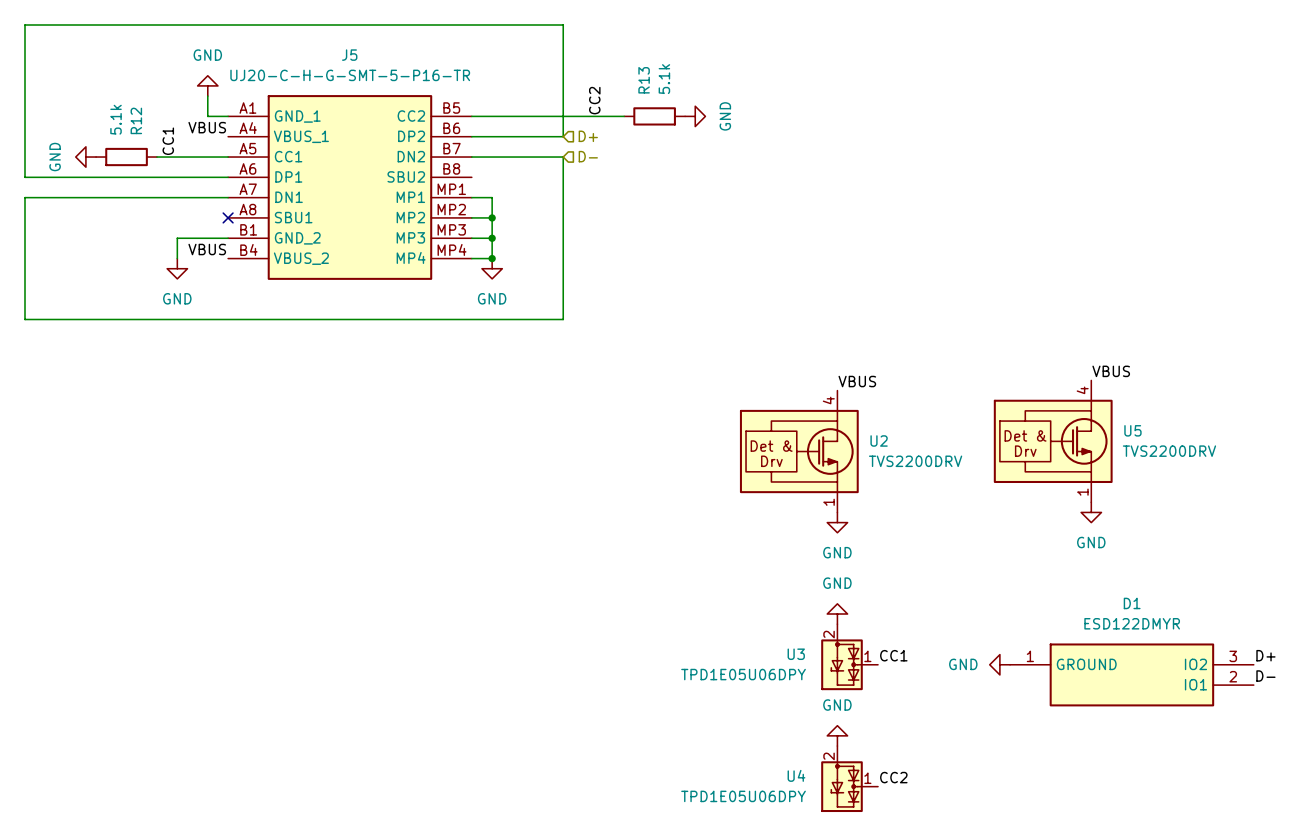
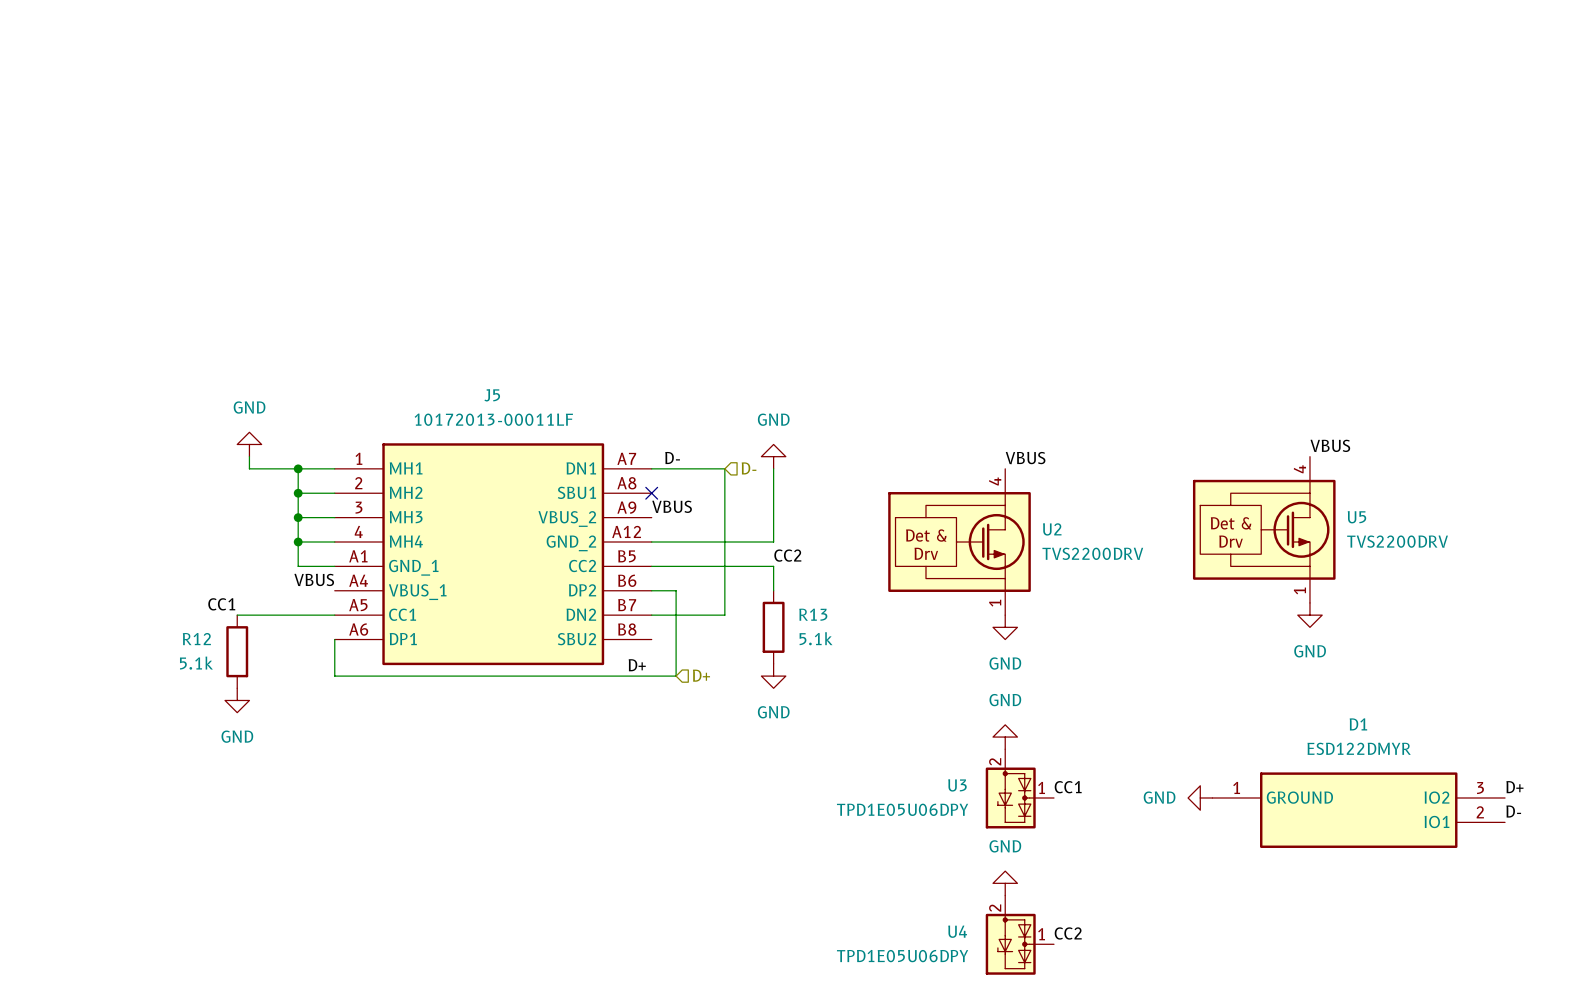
J5 value: UJ20-C-H-G-SMT-5-P16-TR (350, 75) -> 10172013-00011LF (493, 419)
power symbol: GND (207, 85) -> none
J5 symbol: [228, 95, 472, 280] -> [334, 443, 652, 666]
wire: (207, 96) (207, 116) (228, 116) -> none
label: CC2 (594, 100) -> none
wire: (471, 116) (624, 116) -> none
R13 rotation: 0° (654, 116) -> 90° clockwise (773, 627)
R13 position: (654, 116) -> (773, 627)
power symbol: GND (695, 116) -> none
R12 value position: 5.1k (116, 119) -> 5.1k (196, 663)
R12 name position: R12 (136, 120) -> R12 (196, 639)
label: VBUS (207, 127) -> none
wire: (471, 136) (563, 136) (563, 25) (25, 25) (25, 177) (228, 177) -> none
hierarchical label: D+ (588, 136) -> none
label: CC1 (168, 141) -> none
hierarchical label: D- (588, 156) -> none
power symbol: GND (85, 157) -> none
R12 rotation: 0° (126, 157) -> 90° clockwise (237, 651)
R12 position: (126, 157) -> (237, 651)
wire: (157, 157) (228, 157) -> none
wire: (471, 157) (563, 157) (563, 319) (25, 319) (25, 197) (228, 197) -> none
wire: (471, 197) (492, 197) (492, 258) (471, 258) -> none
no-connect mark: (228, 217) -> none
wire: (471, 217) (492, 217) -> none
junction: (492, 217) -> none
wire: (228, 238) (177, 238) (177, 258) -> none
wire: (471, 238) (492, 238) -> none
junction: (492, 238) -> none
label: VBUS (207, 249) -> none
junction: (492, 258) -> none
power symbol rotation: 0° (177, 268) -> 180° (249, 444)
power symbol position: GND (177, 268) -> GND (249, 444)
power symbol: GND (492, 268) -> none
wire: none -> (249, 456) (249, 468) (334, 468)
power symbol: none -> GND (773, 456)
label: none -> D- (672, 458)
wire: none -> (298, 468) (298, 566) (334, 566)
junction: none -> (298, 468)
wire: none -> (651, 468) (724, 468) (724, 615) (651, 615)
hierarchical label: none -> D- (749, 468)
wire: none -> (773, 468) (773, 542) (651, 542)
wire: none -> (298, 493) (334, 493)
junction: none -> (298, 493)
no-connect mark: none -> (651, 493)
label: none -> VBUS (672, 506)
wire: none -> (298, 517) (334, 517)
junction: none -> (298, 517)
wire: none -> (298, 542) (334, 542)
junction: none -> (298, 542)
label: none -> CC2 (787, 555)
wire: none -> (651, 566) (773, 566) (773, 590)
label: none -> VBUS (314, 579)
wire: none -> (651, 590) (676, 590) (676, 676) (334, 676) (334, 639)
label: none -> CC1 (221, 604)
wire: none -> (237, 615) (334, 615)
label: none -> D+ (637, 665)
hierarchical label: none -> D+ (701, 675)
power symbol: none -> GND (773, 676)
power symbol: none -> GND (237, 700)

